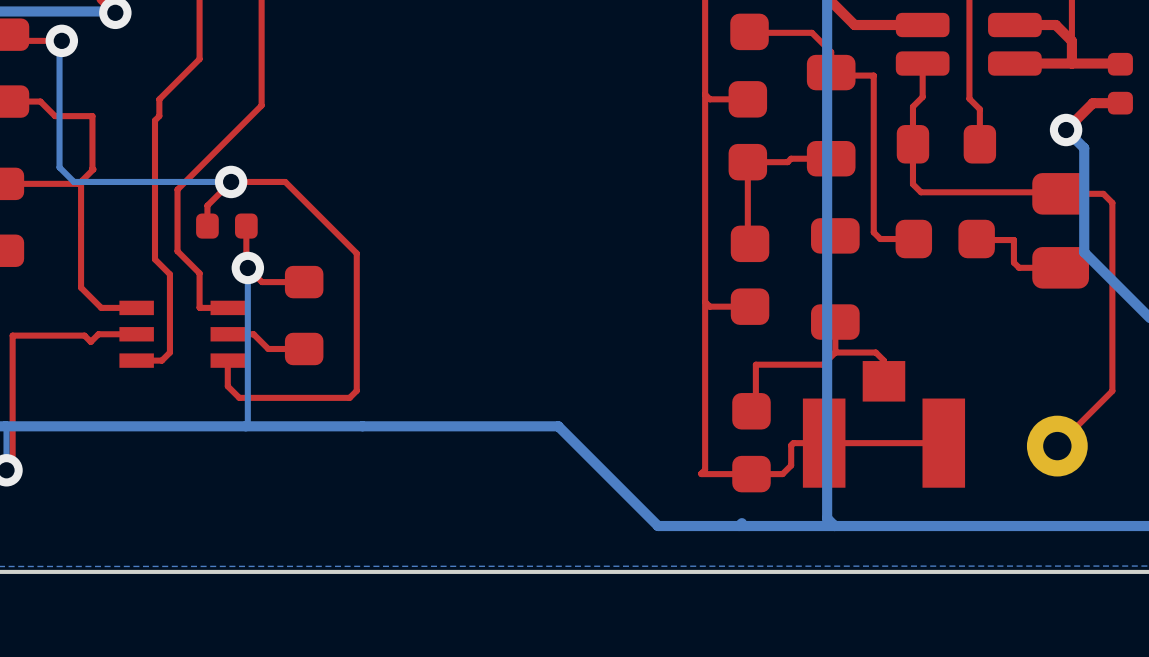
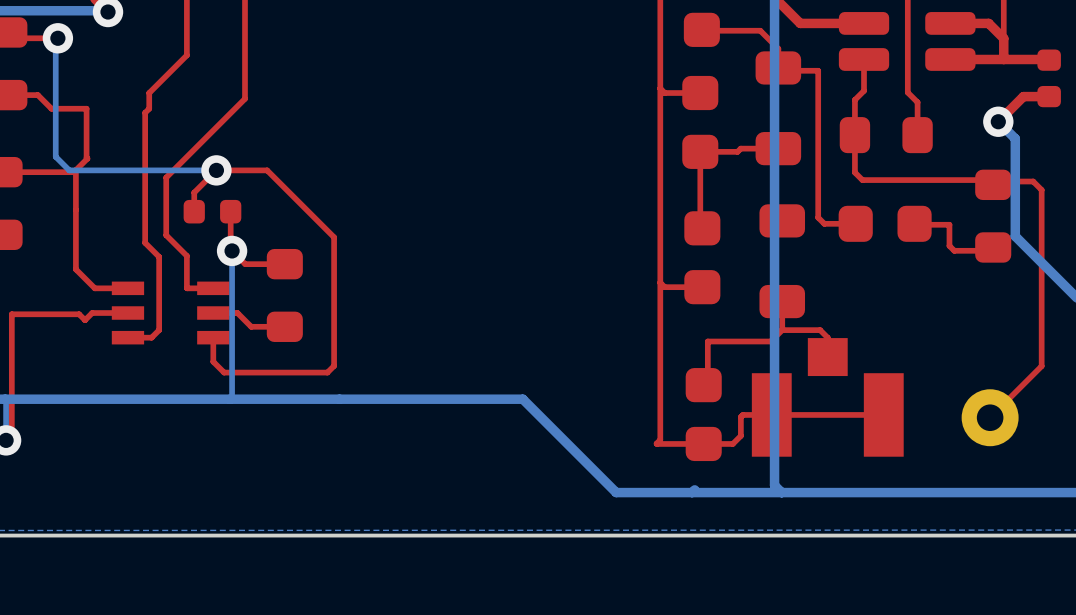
part footprint: [1032, 173, 1090, 289] -> [975, 169, 1012, 263]

